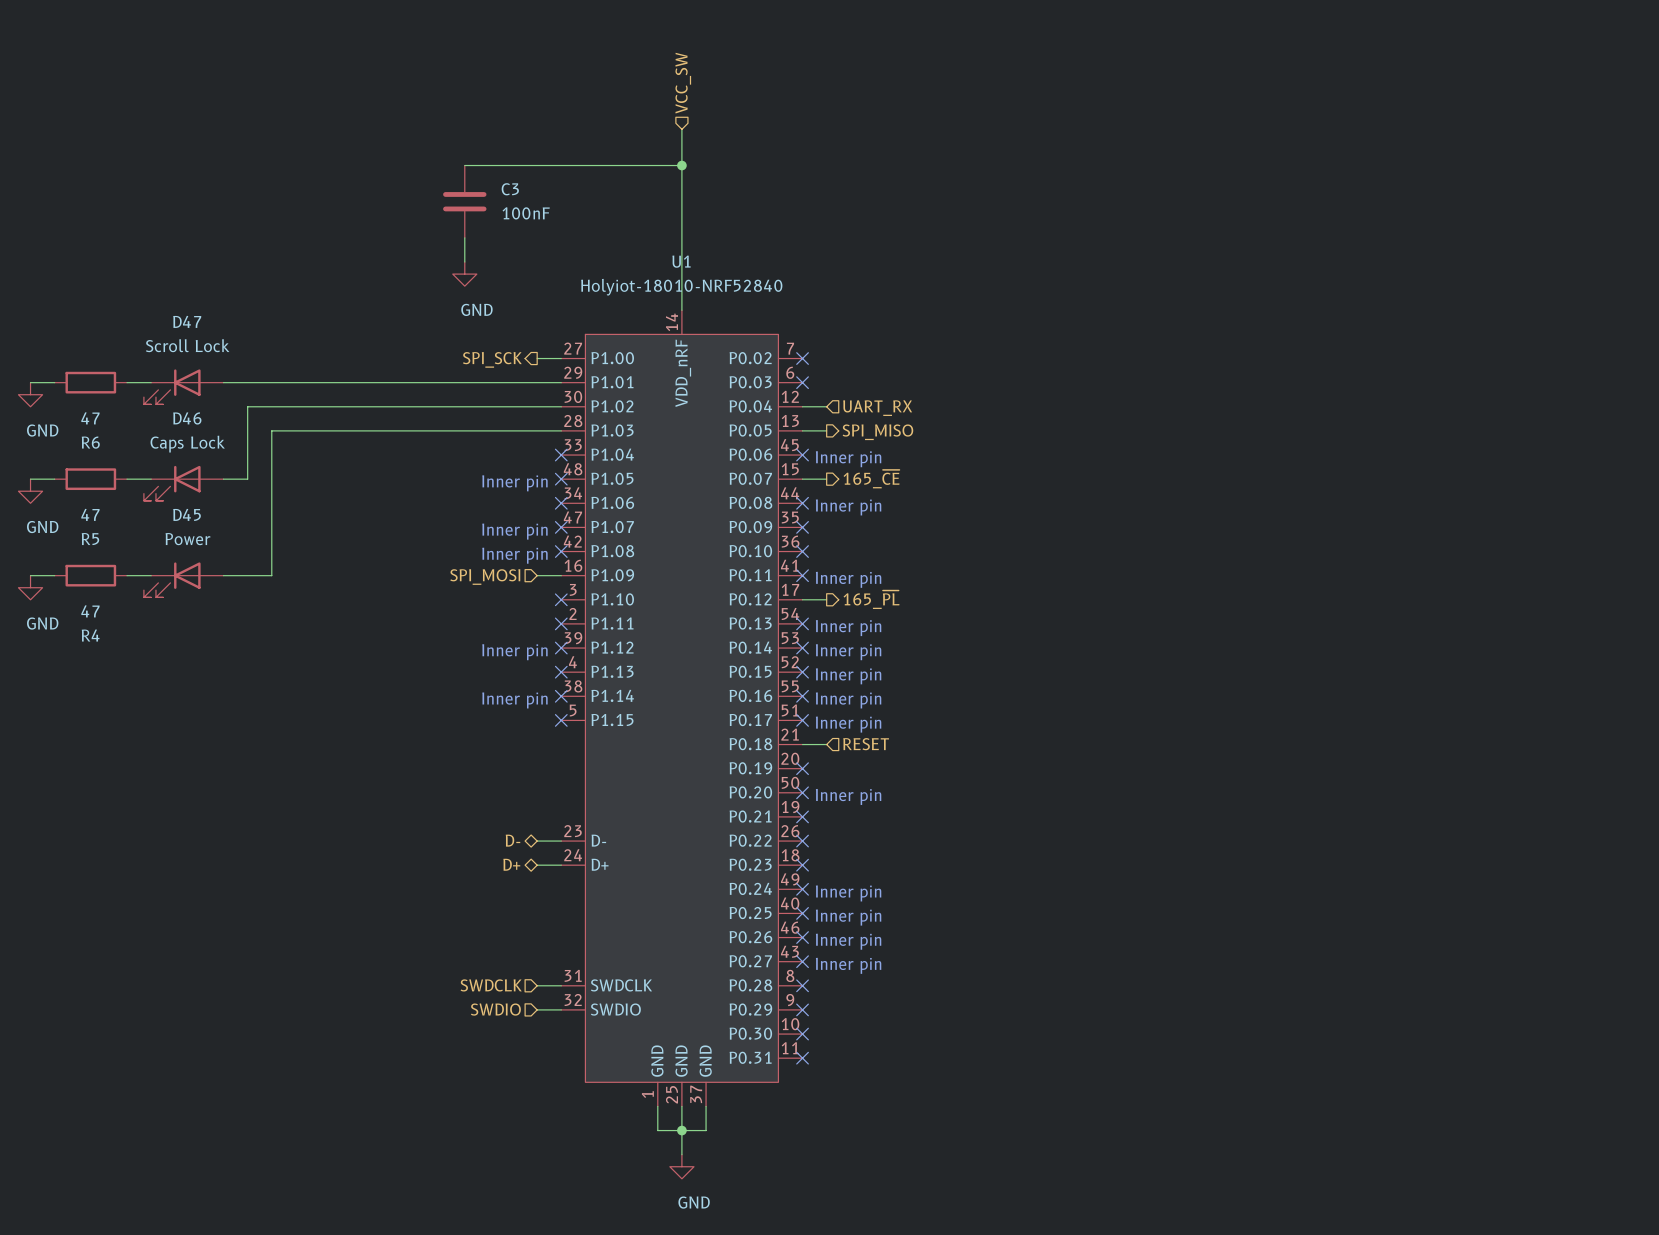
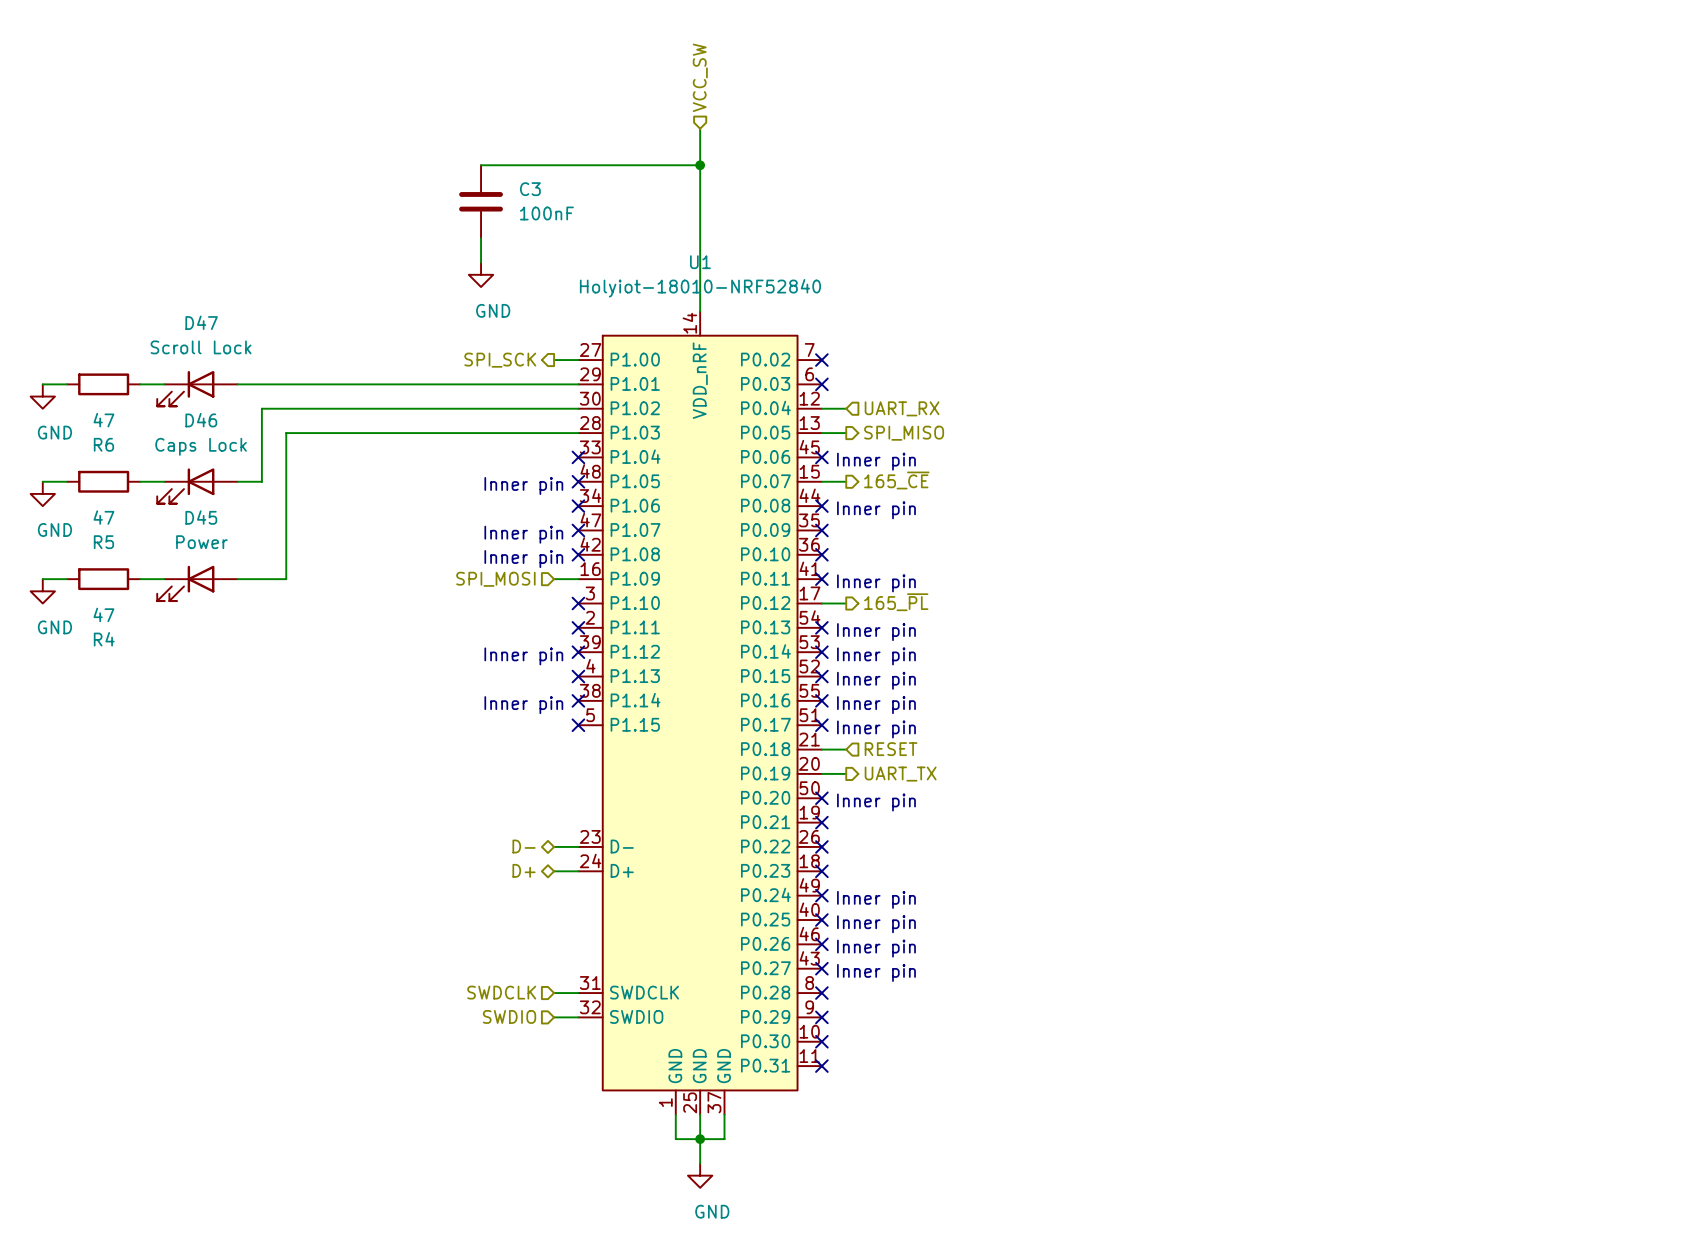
wire: none -> (821, 773) (846, 773)
no-connect mark: (802, 768) -> none
hierarchical label: none -> UART_TX (900, 774)

